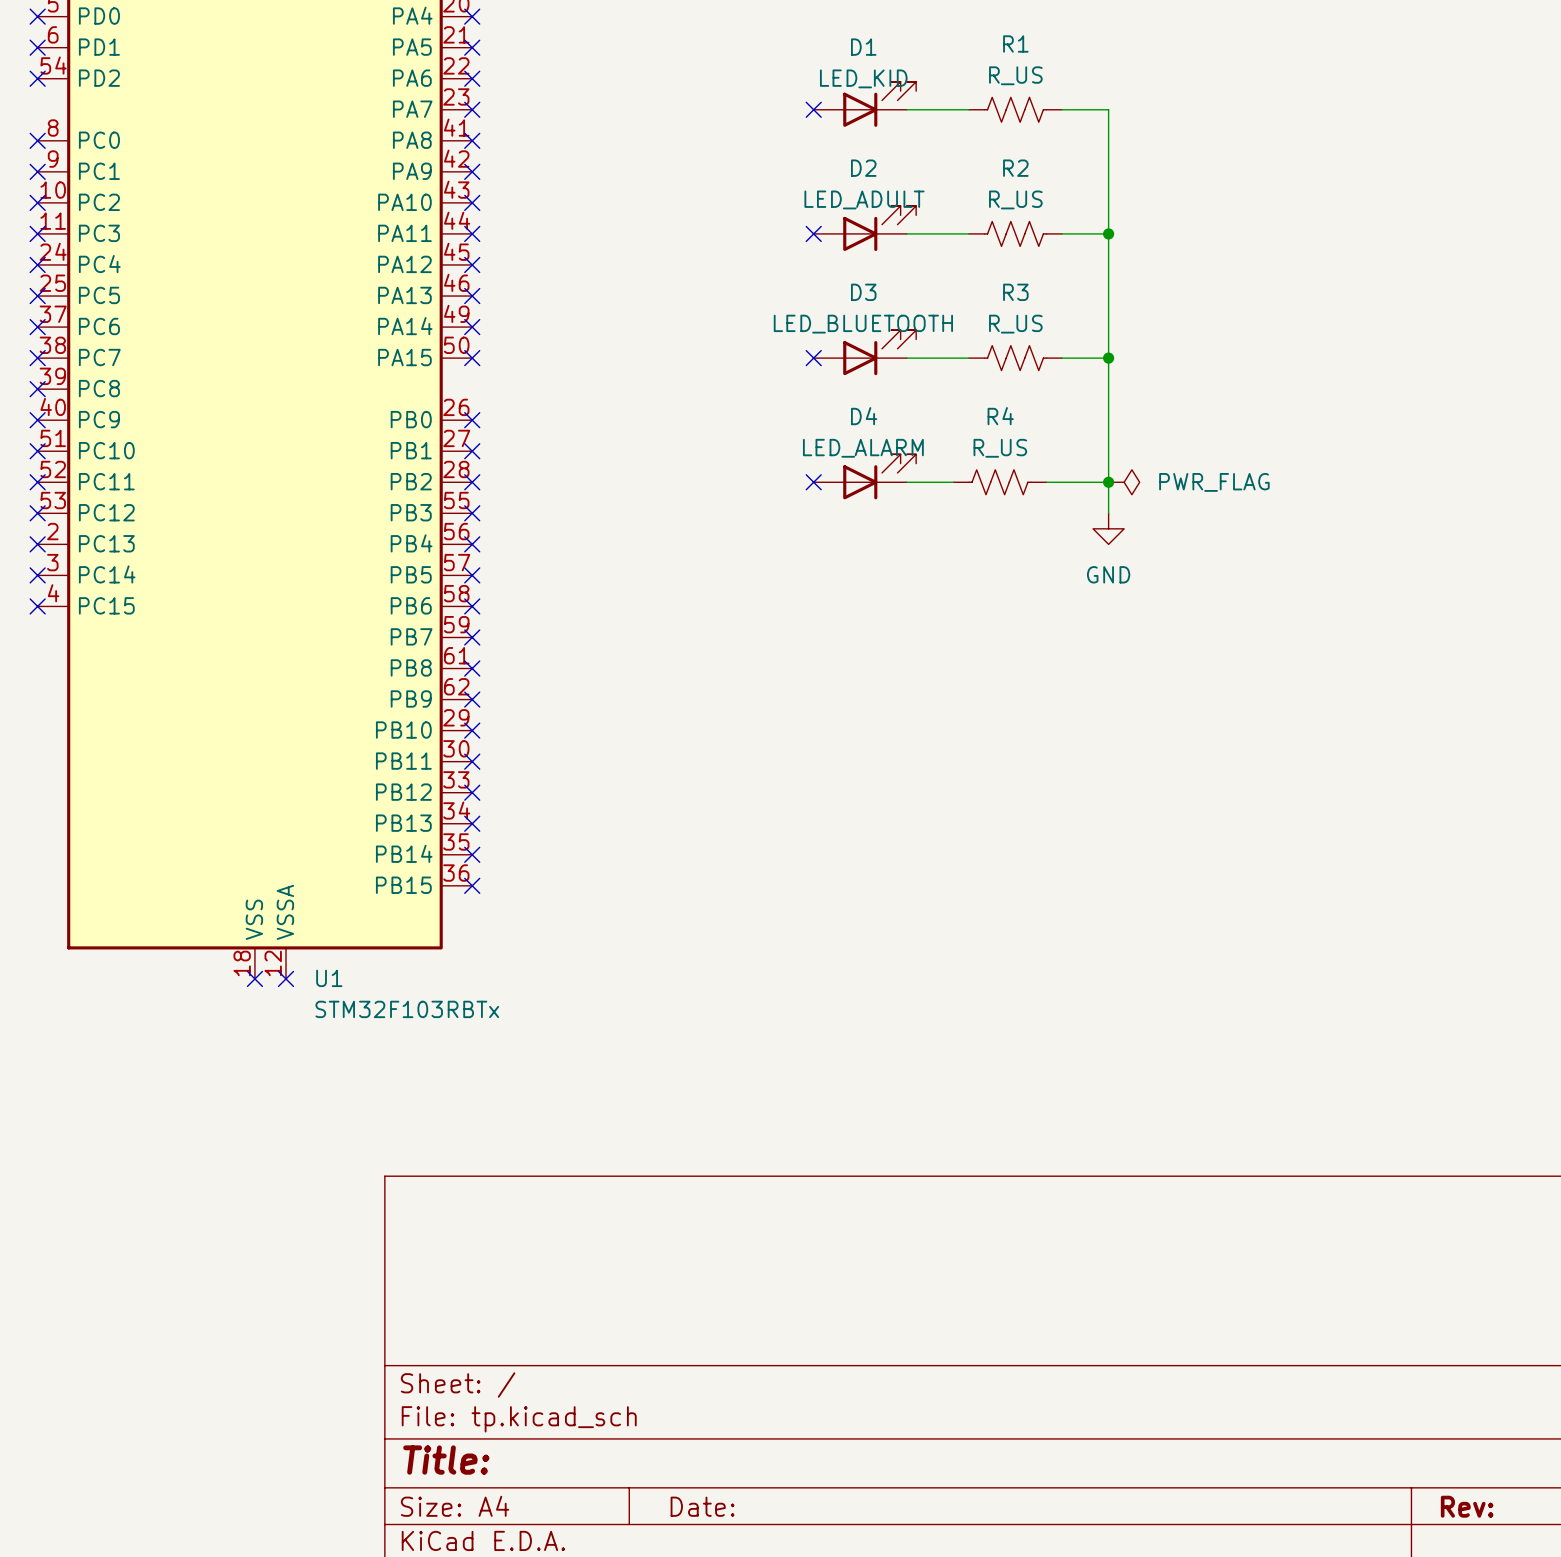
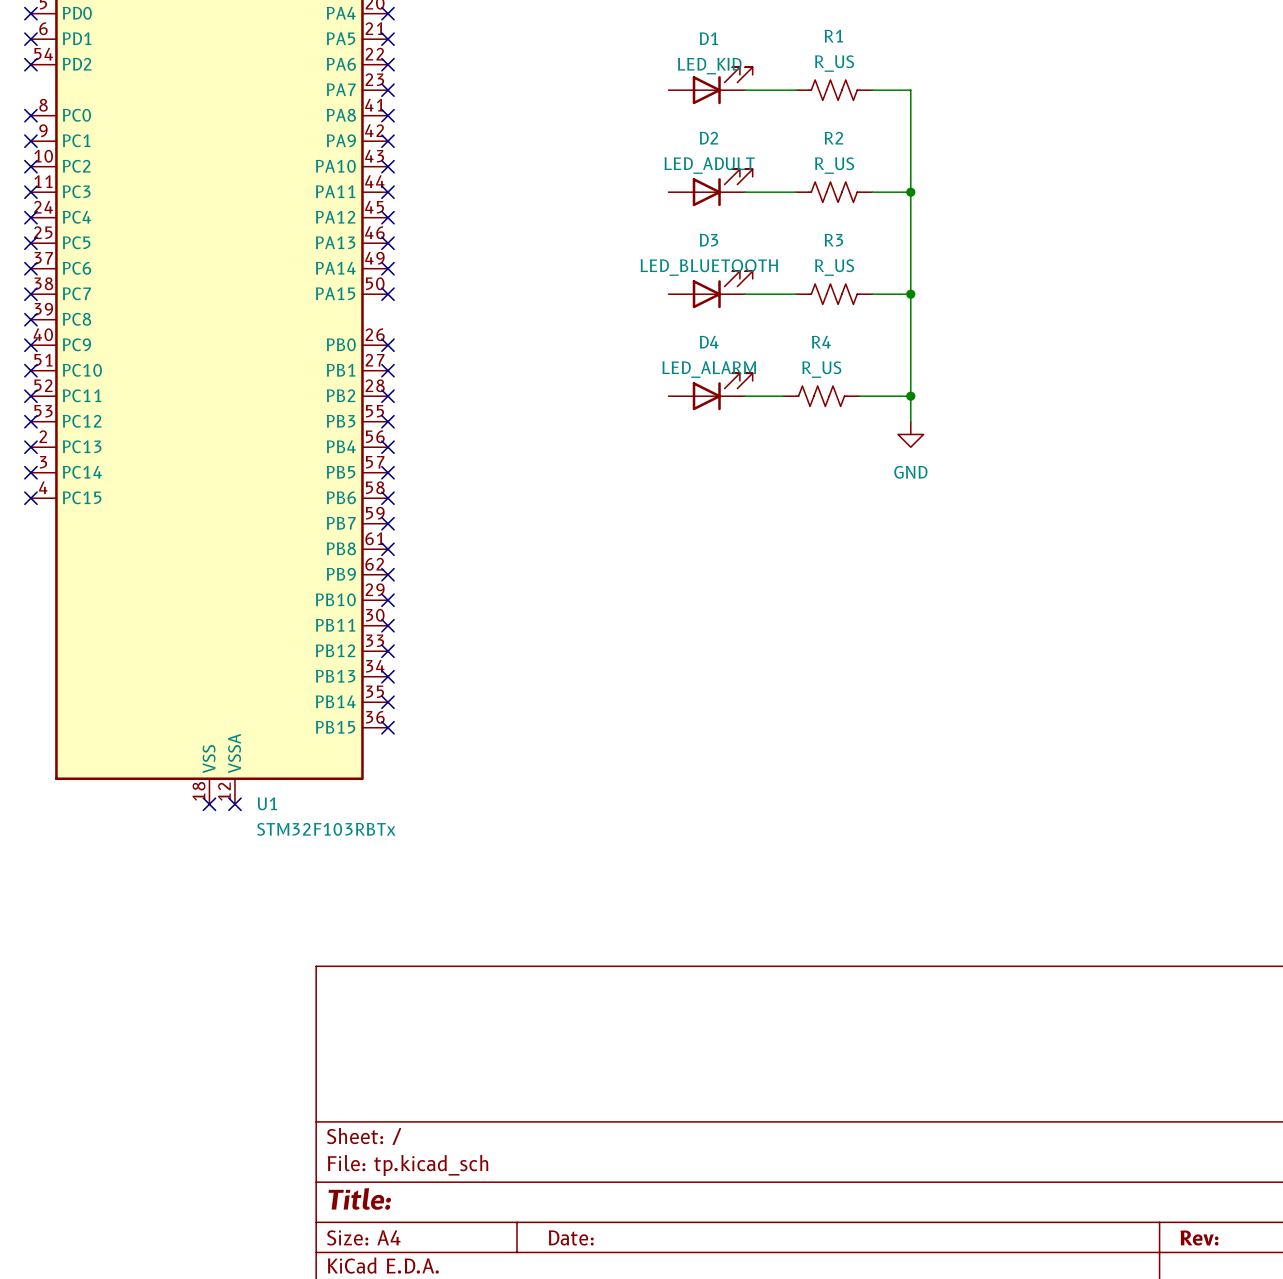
no-connect mark: (813, 109) -> none
no-connect mark: (813, 233) -> none
no-connect mark: (813, 358) -> none
no-connect mark: (813, 482) -> none
power symbol: PWR_FLAG (1124, 482) -> none

